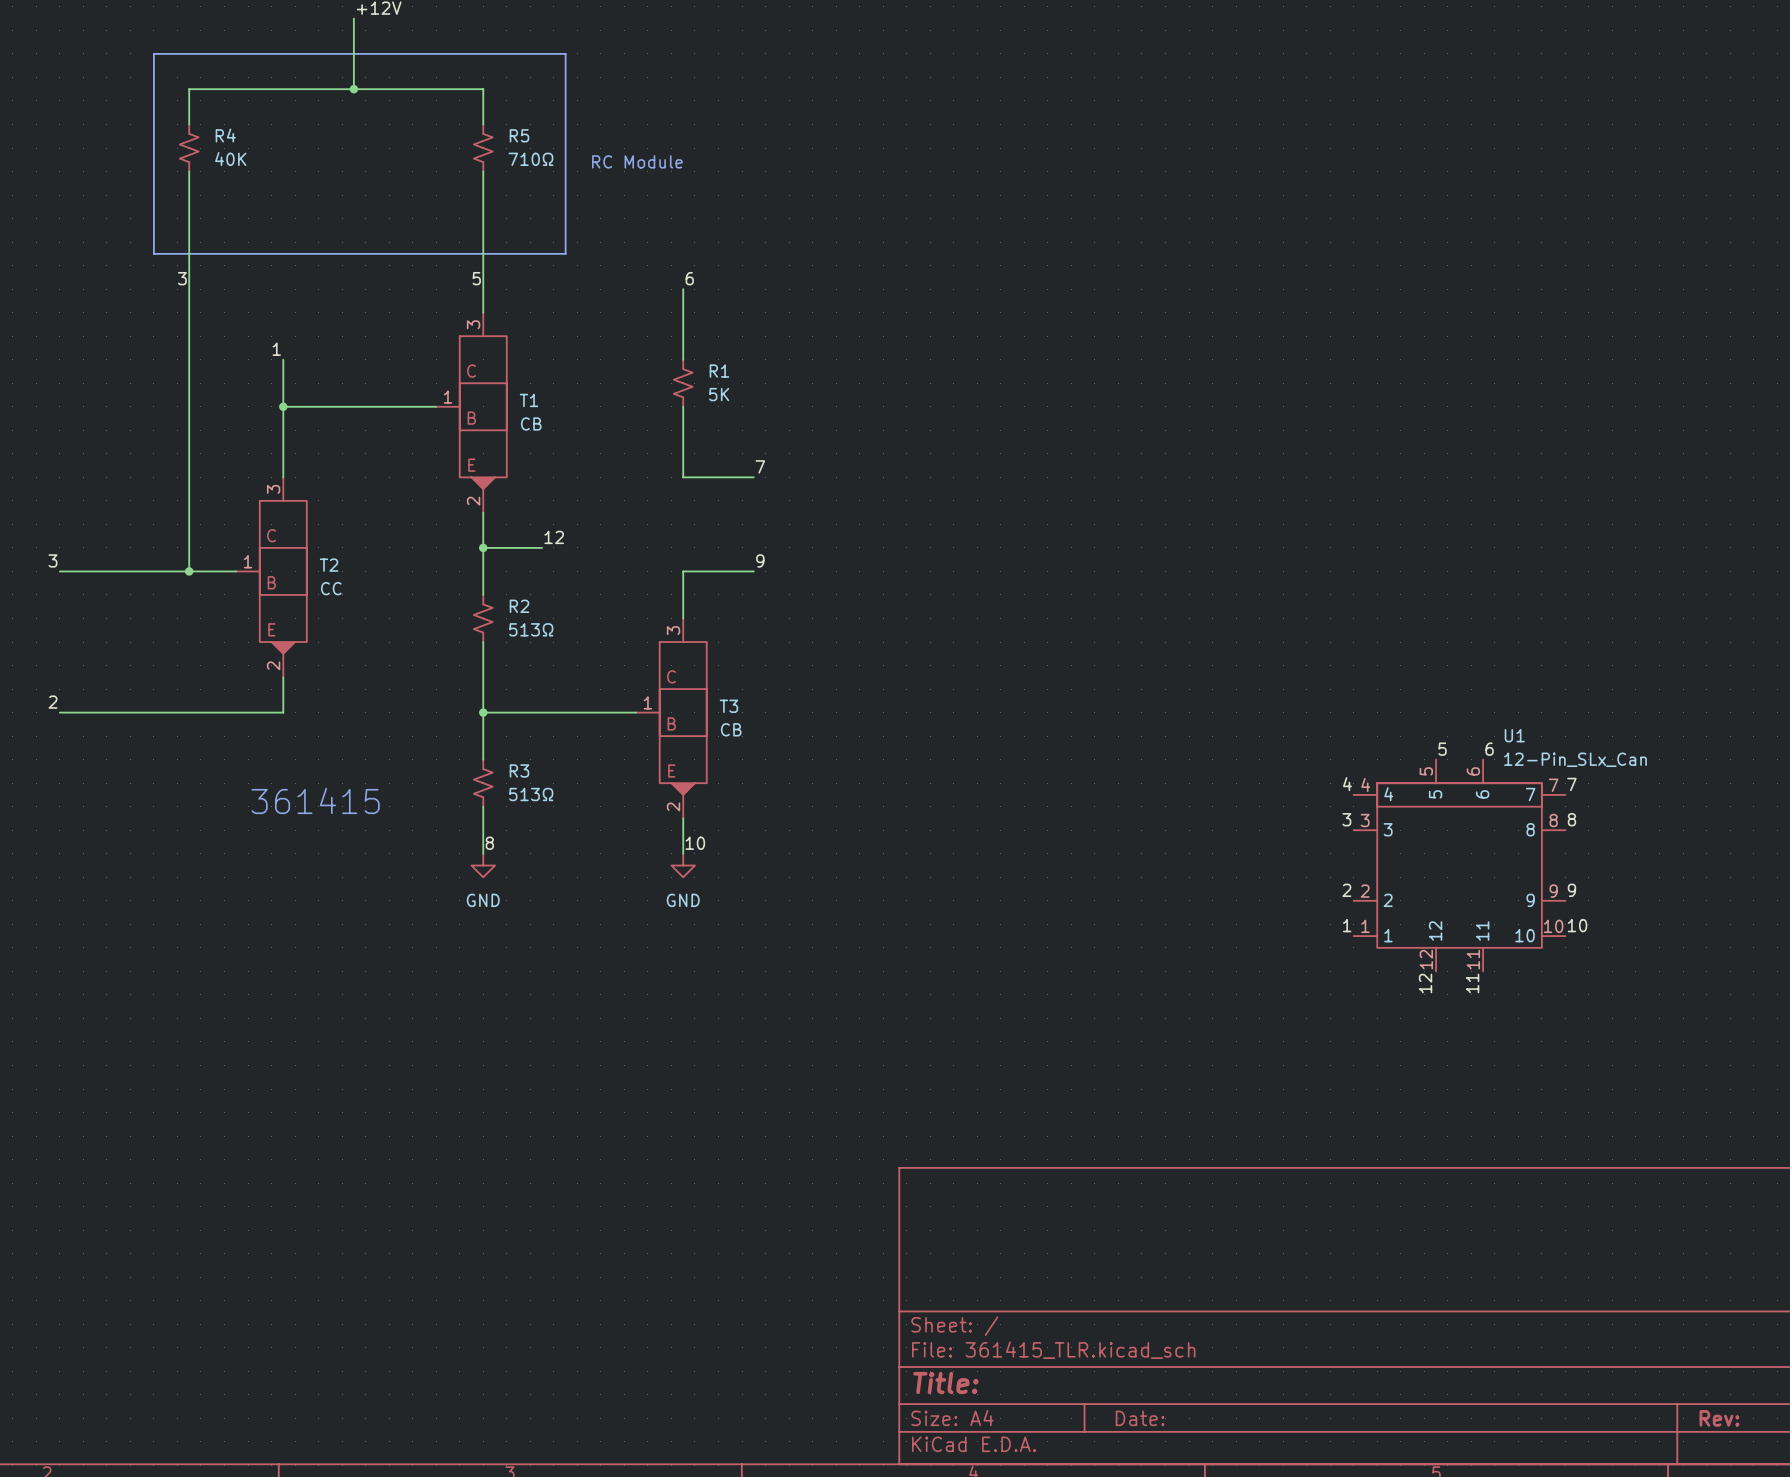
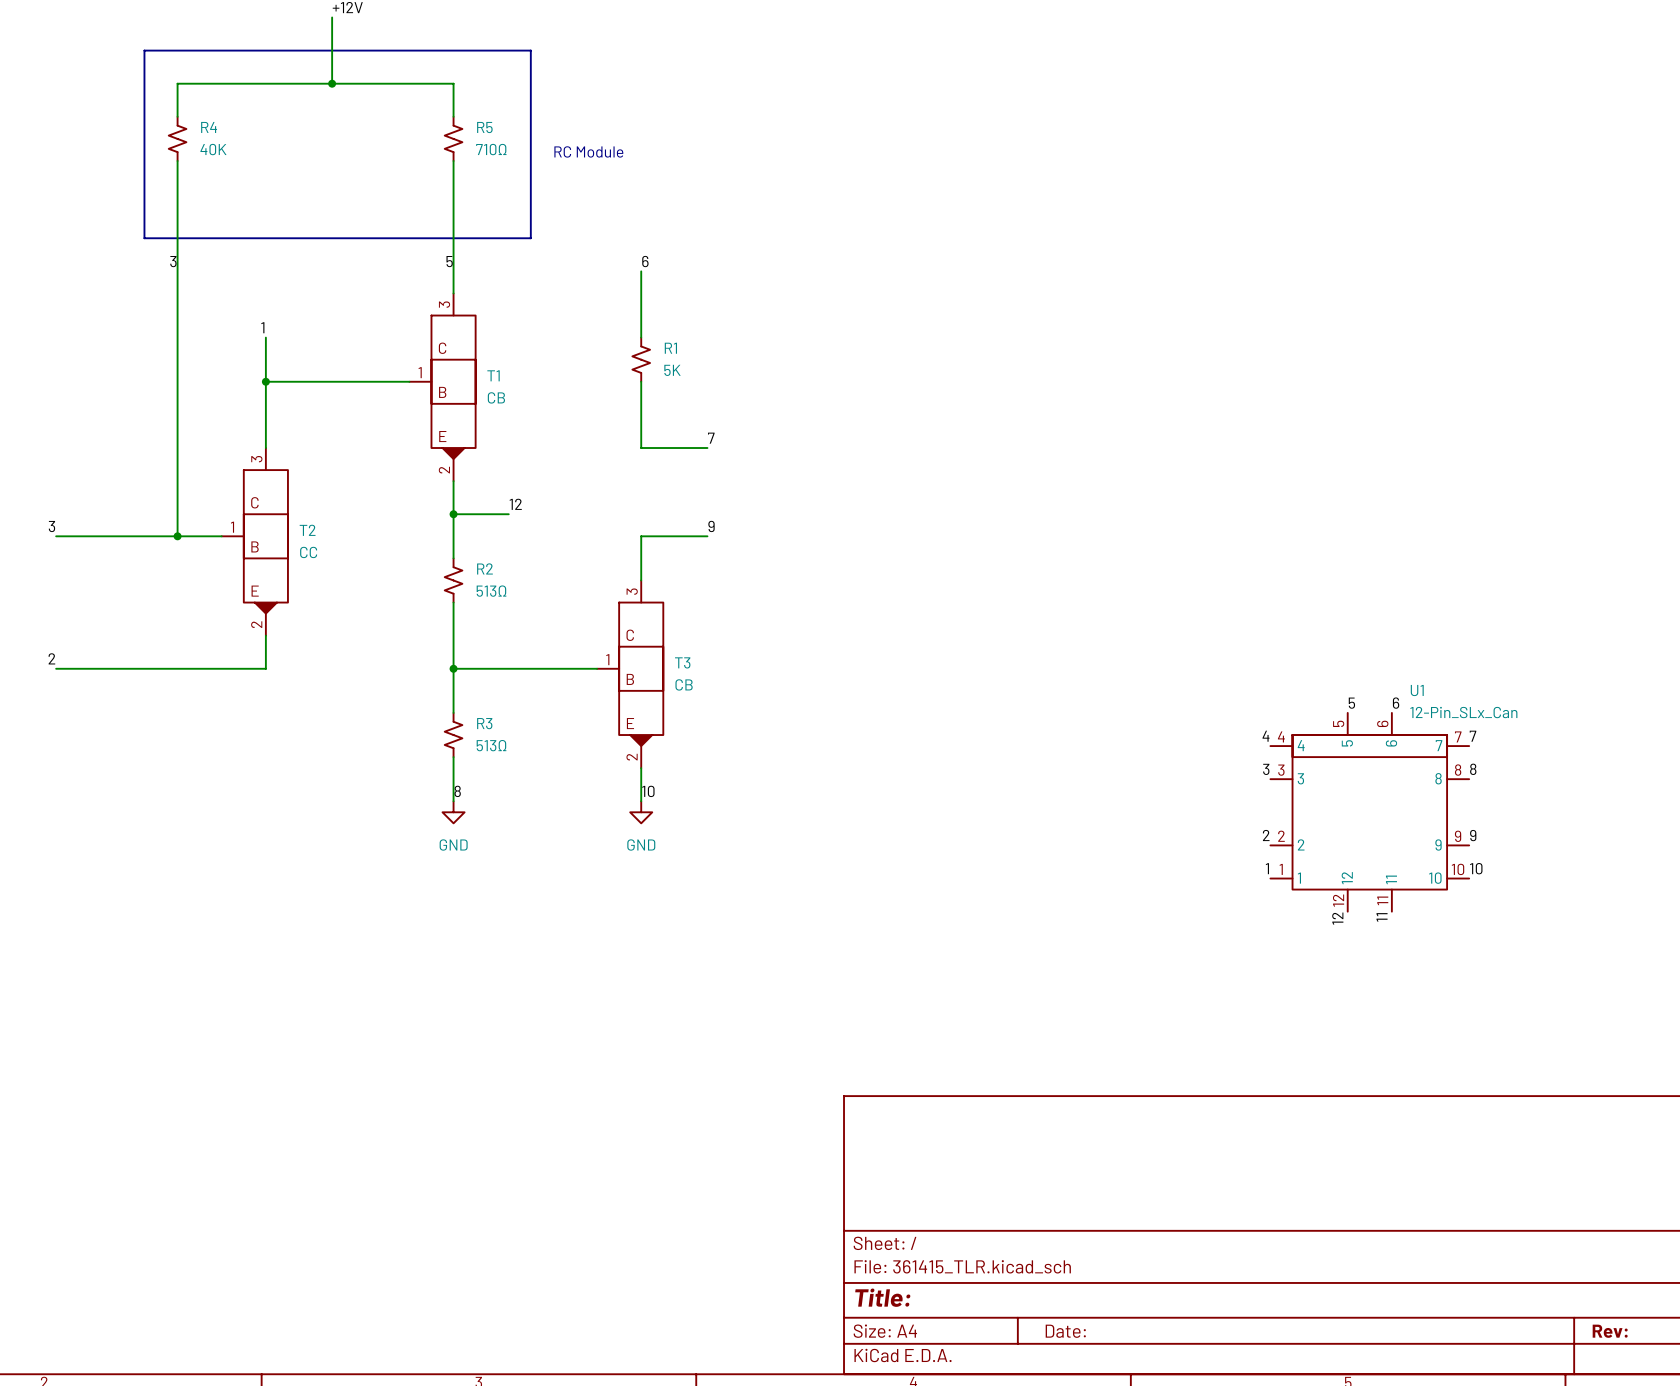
text: 361415 (315, 800) -> none

